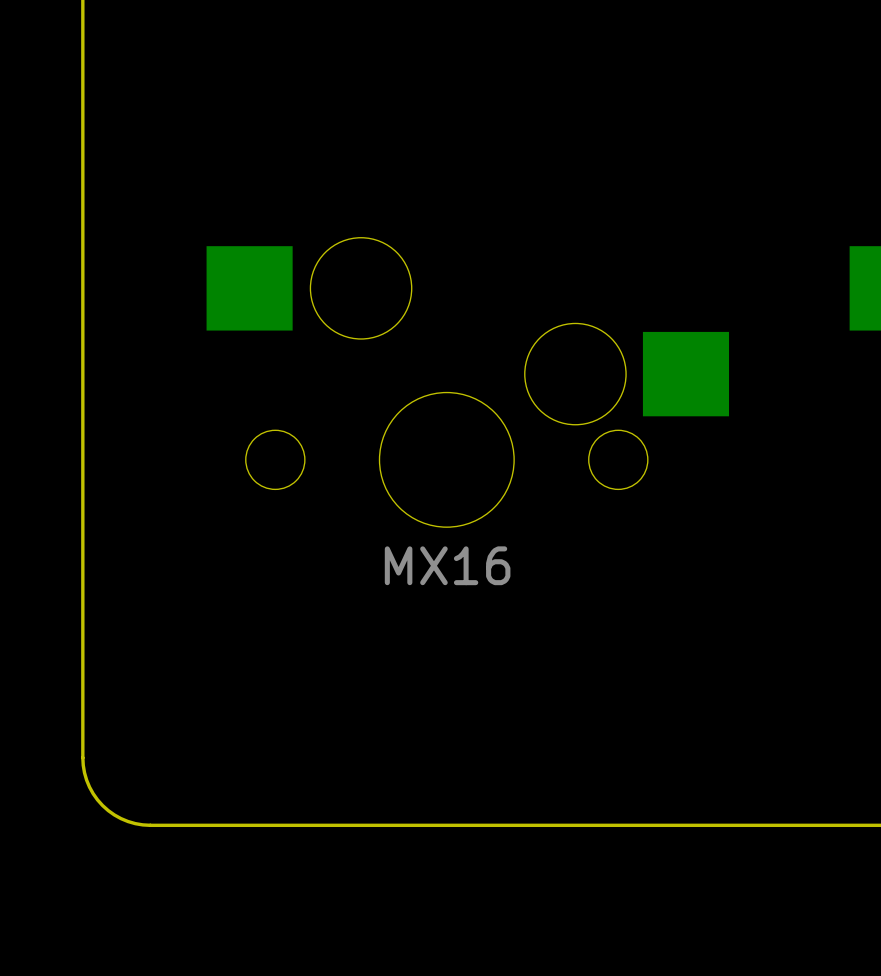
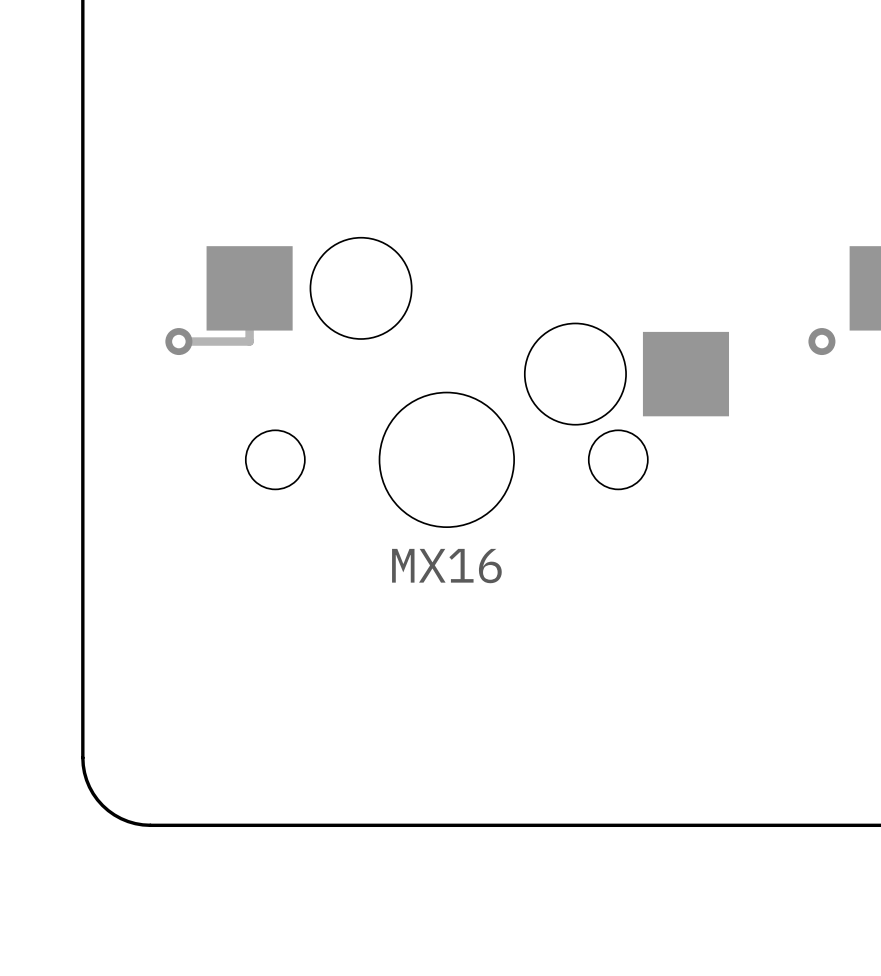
track: none -> (249, 288) (249, 341) (178, 341)
via: none -> (178, 341)
via: none -> (821, 341)

